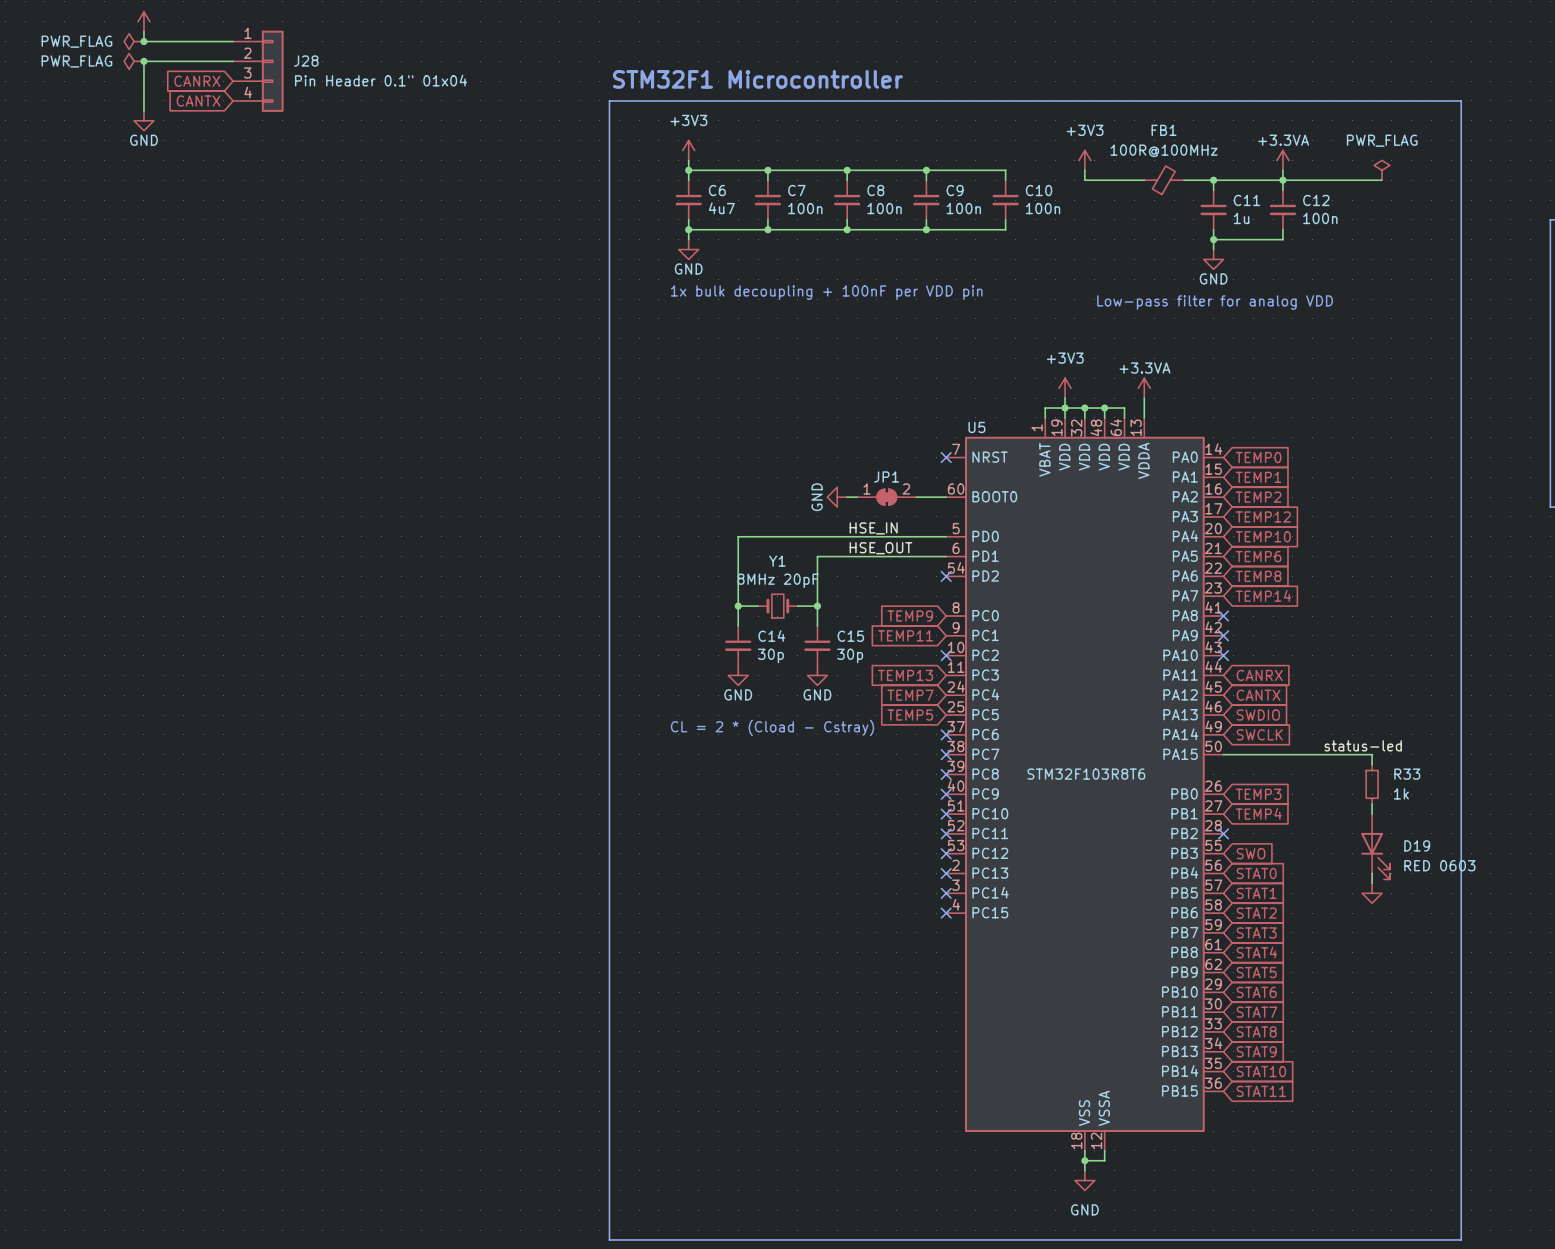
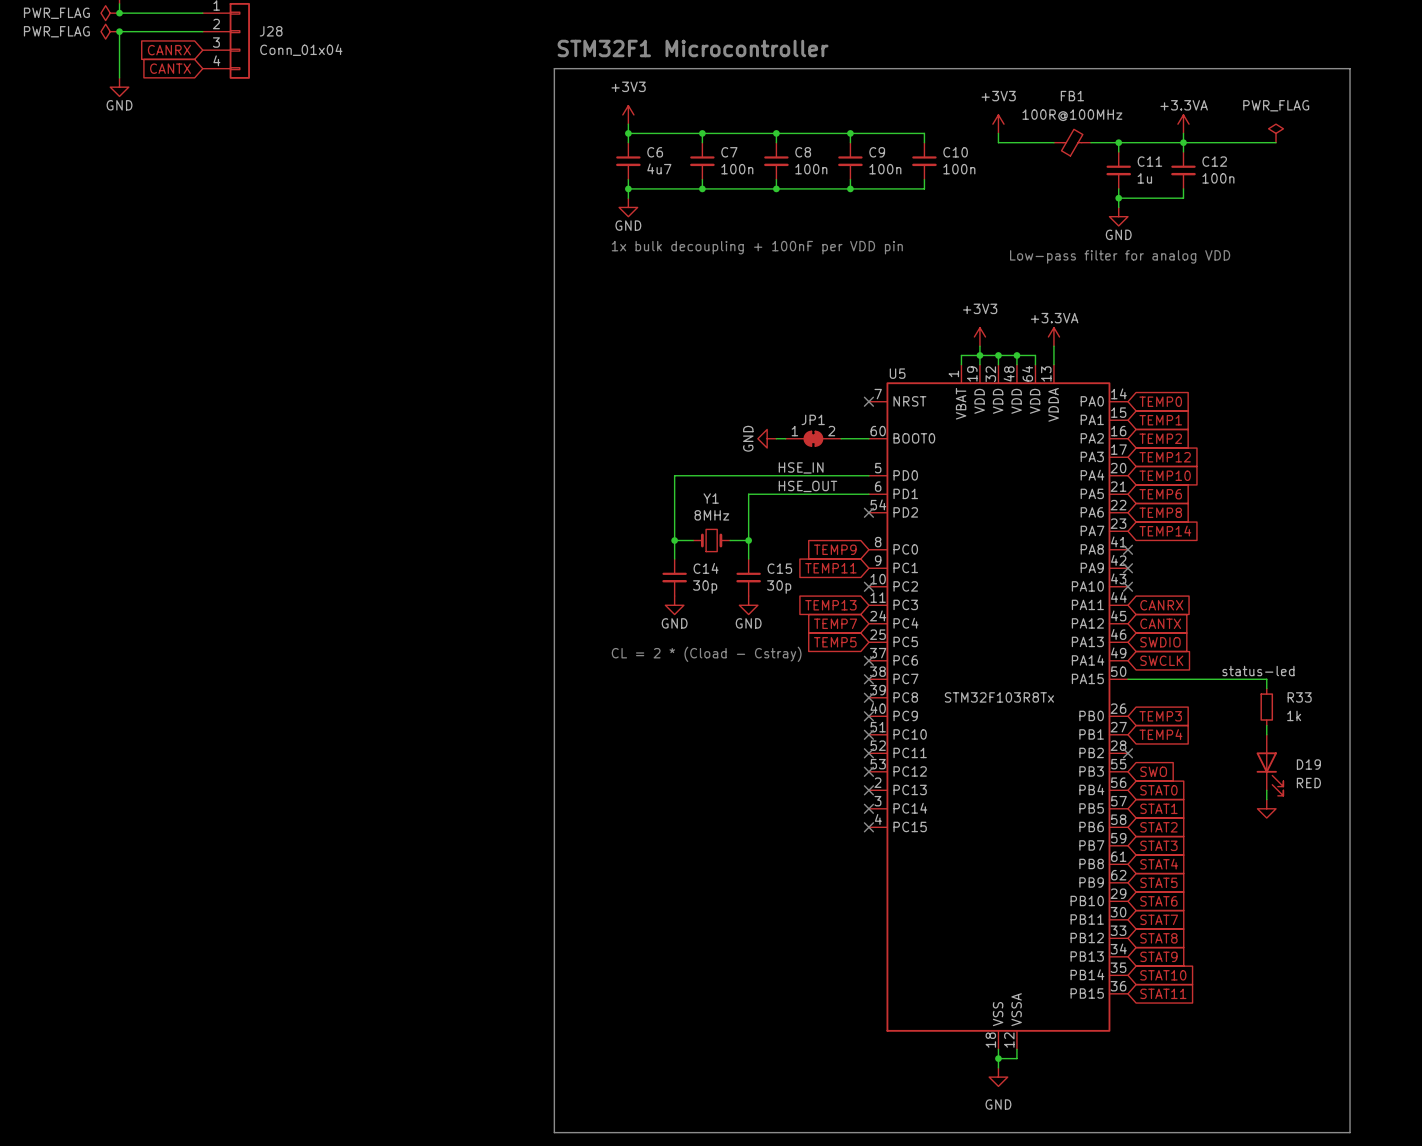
J28 value: Pin Header 0.1" 01x04 (381, 80) -> Conn_01x04 (301, 50)
Y1 value: 8MHz 20pF (778, 580) -> 8MHz (711, 515)
U5 value: STM32F103R8T6 (1086, 774) -> STM32F103R8Tx (999, 697)
D19 value: RED 0603 (1439, 865) -> RED (1308, 783)

